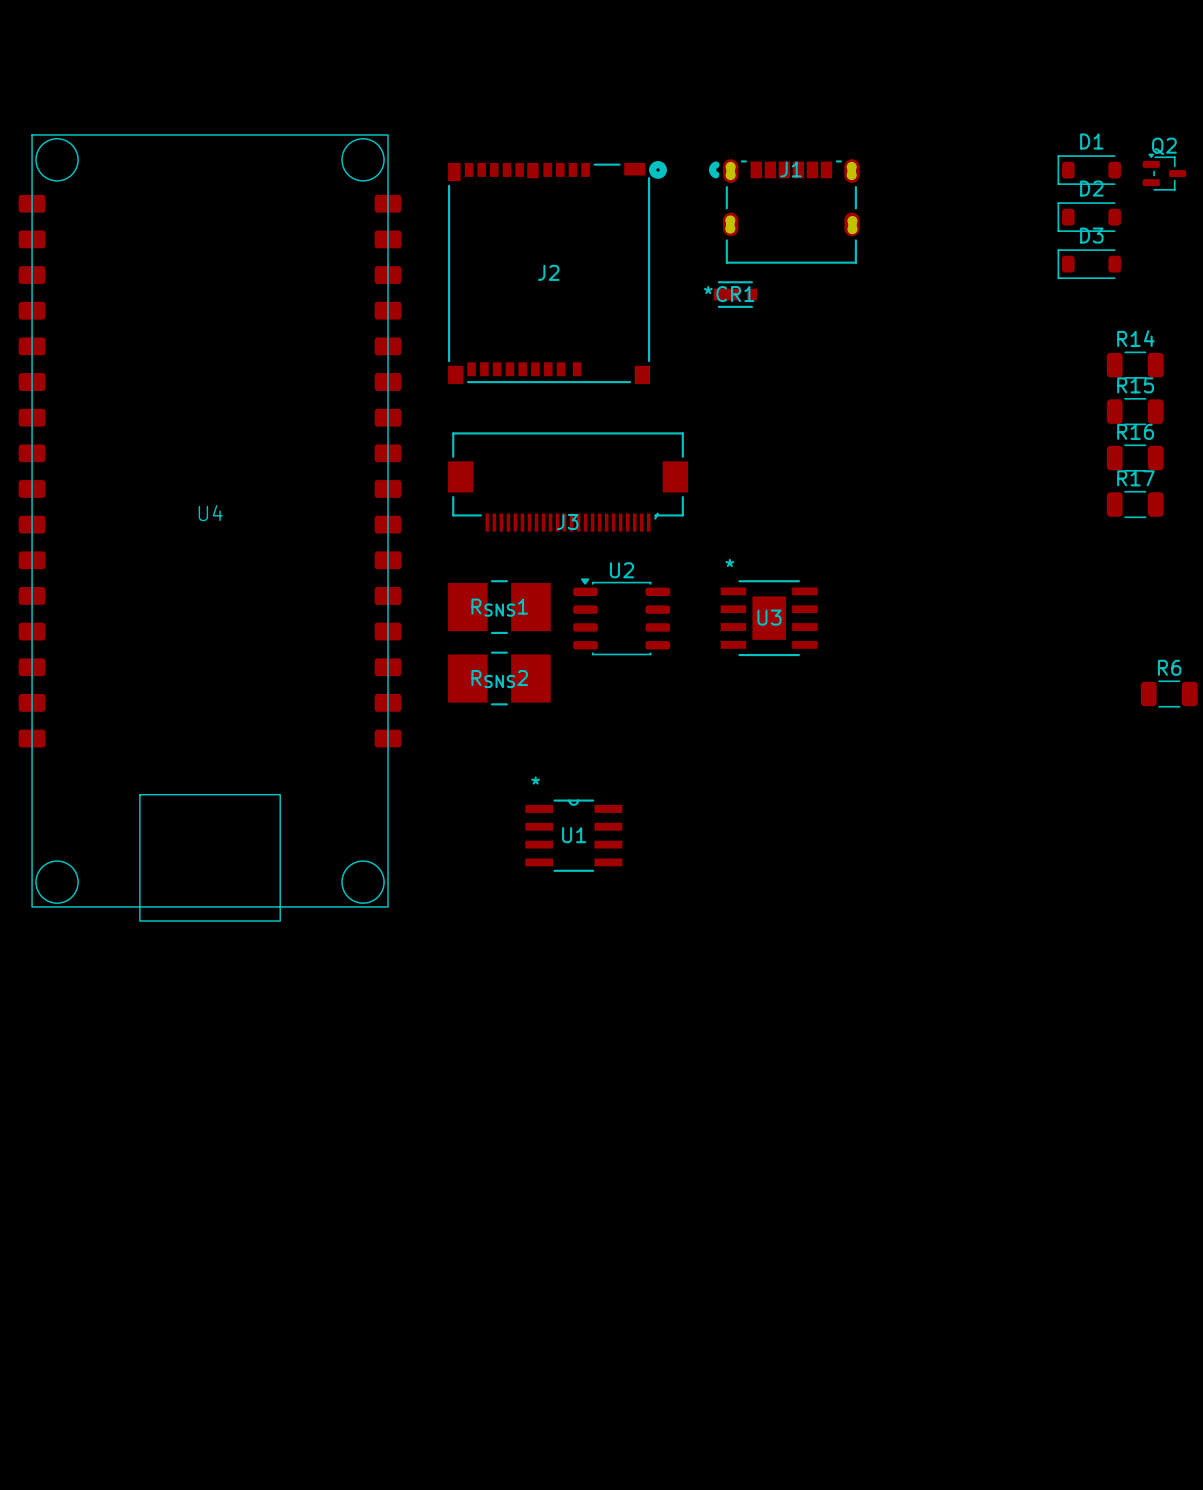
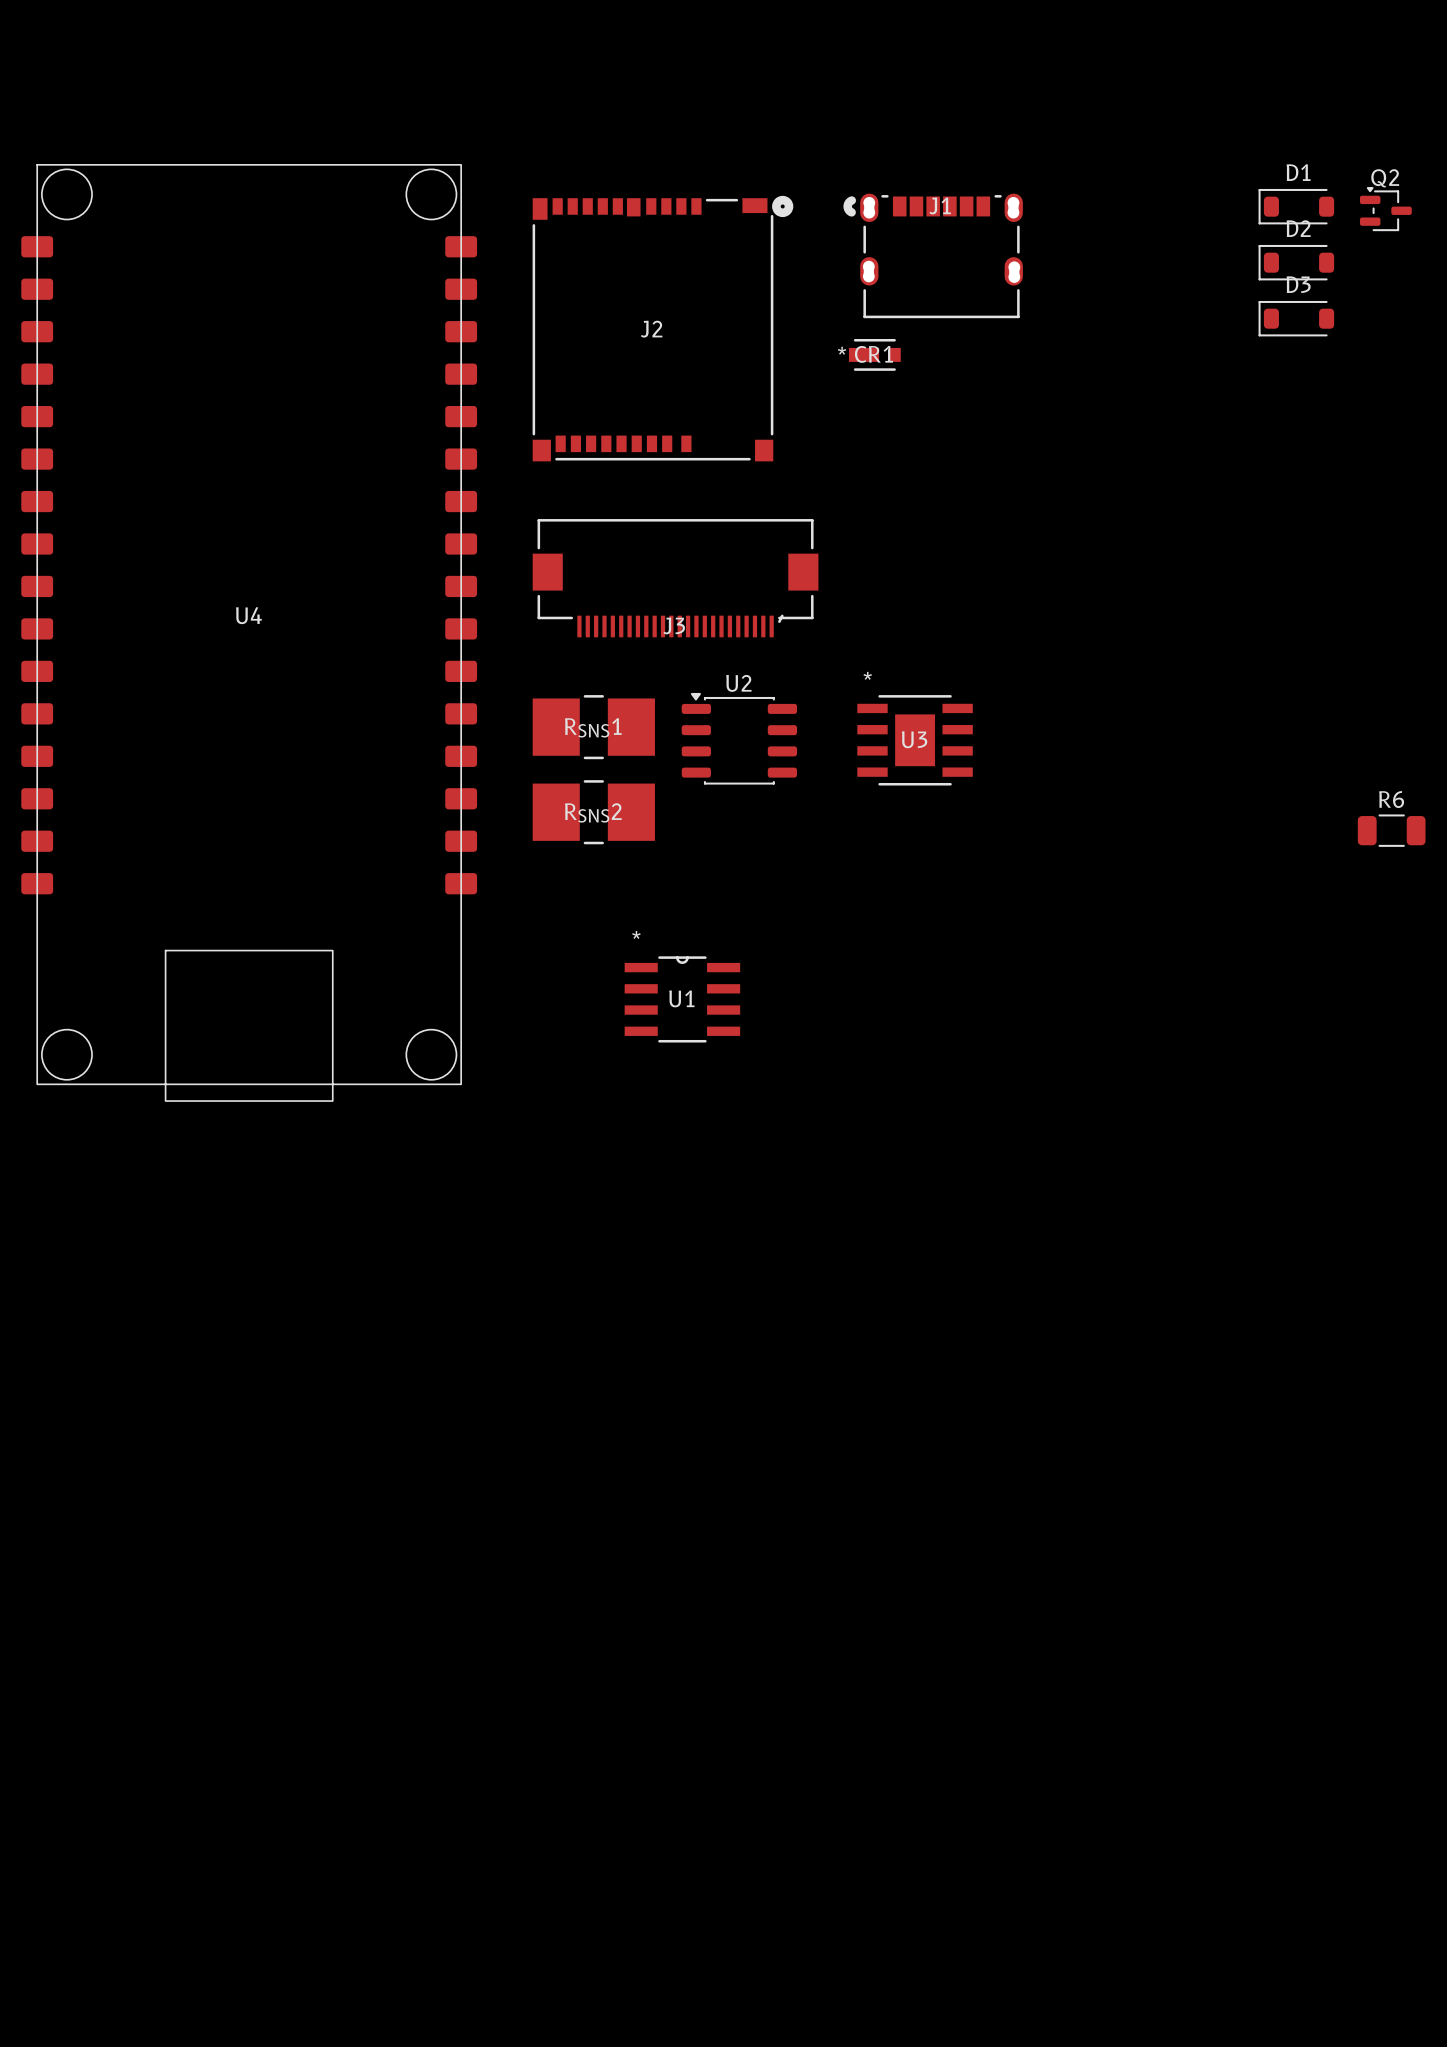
R14: (1135, 365) -> none
R15: (1135, 411) -> none
R16: (1135, 458) -> none
R17: (1135, 504) -> none

